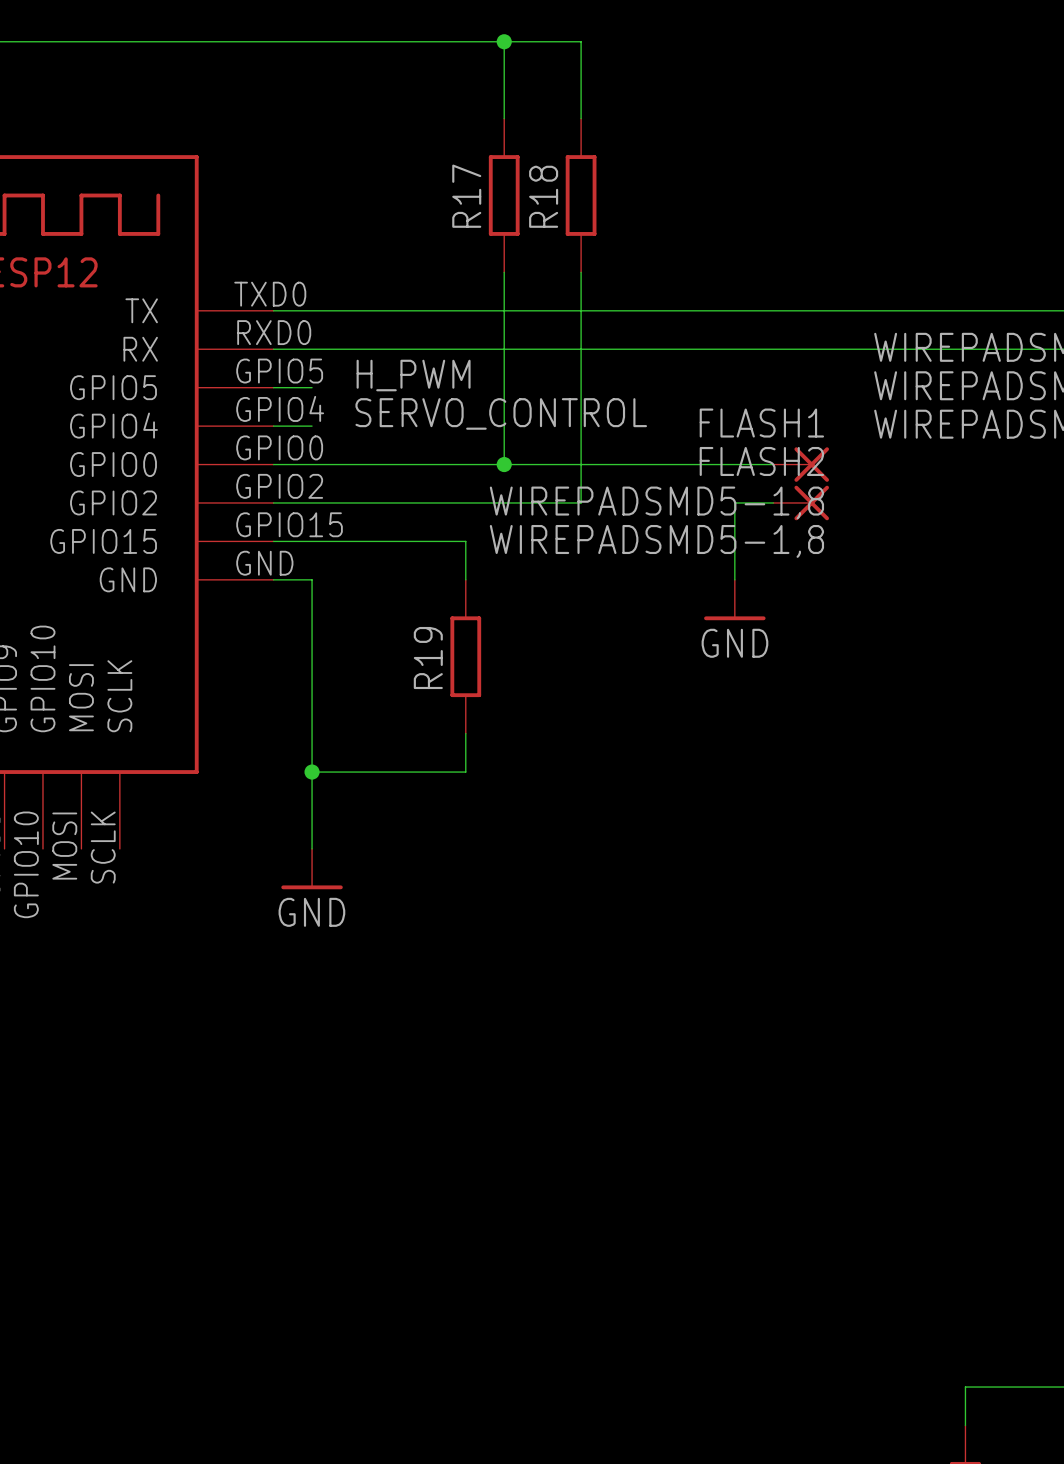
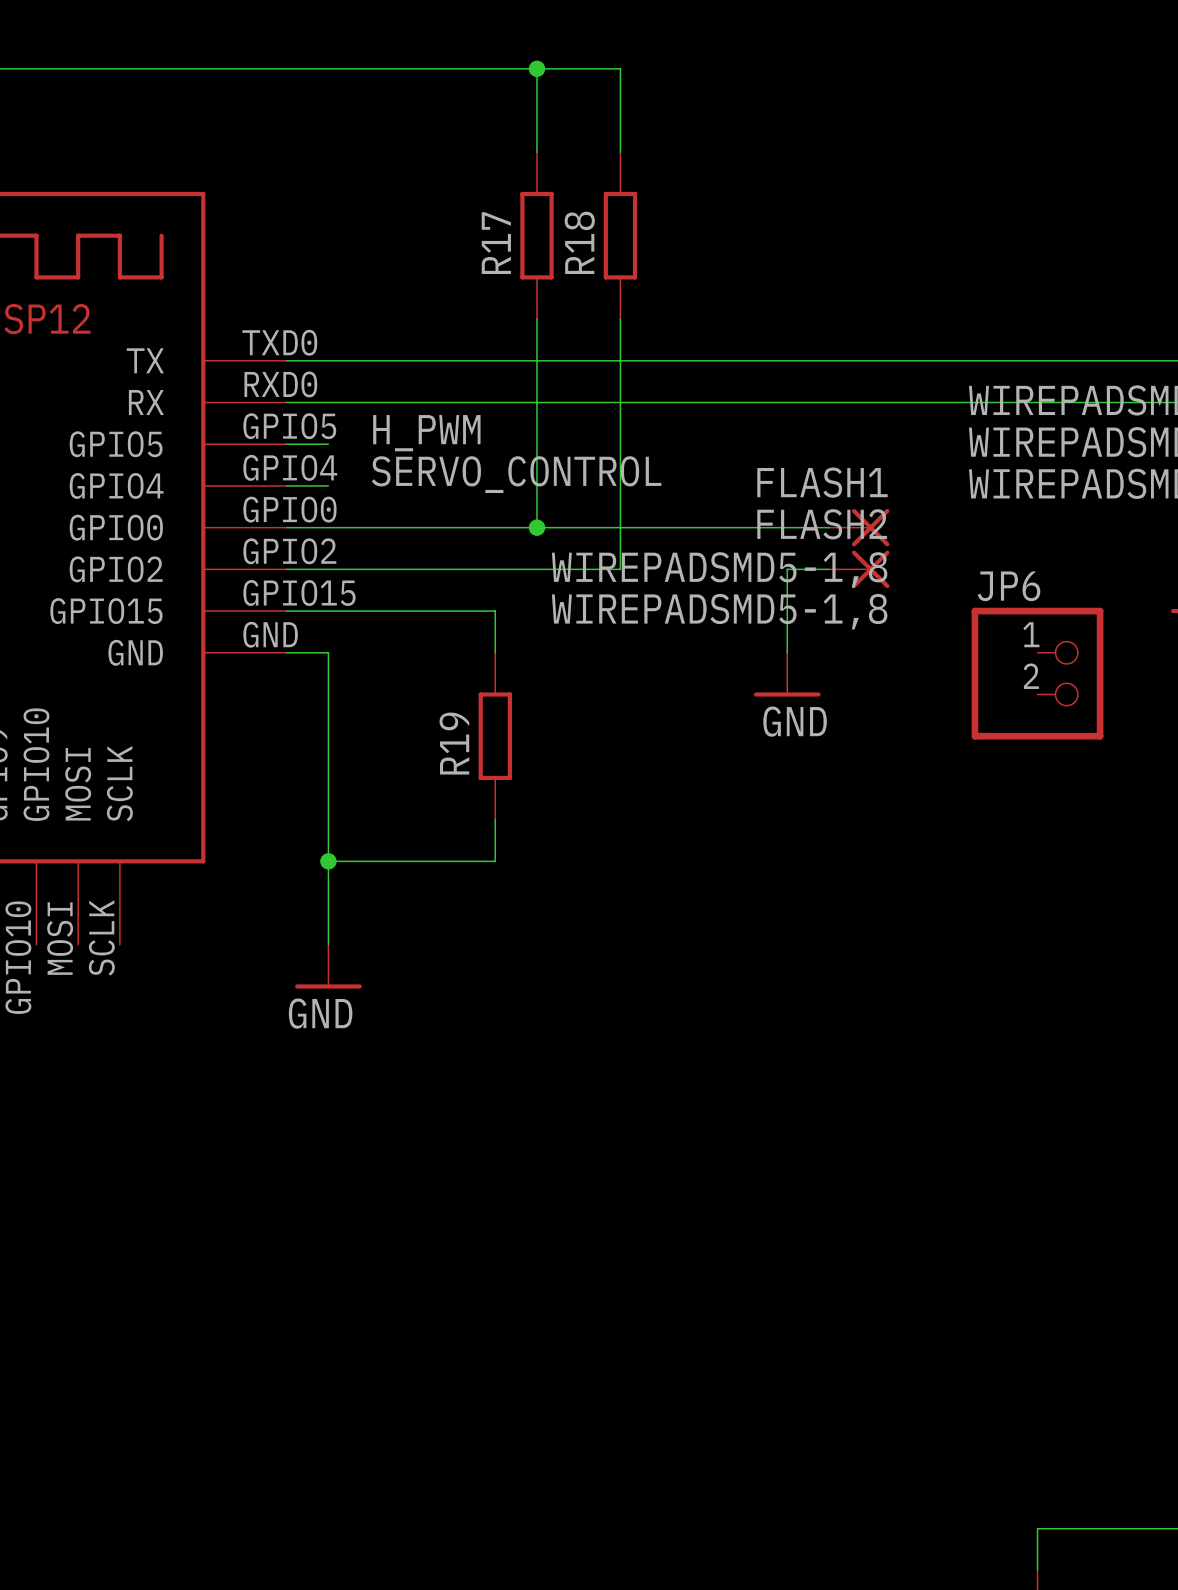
JP6: none -> (1037, 673)

